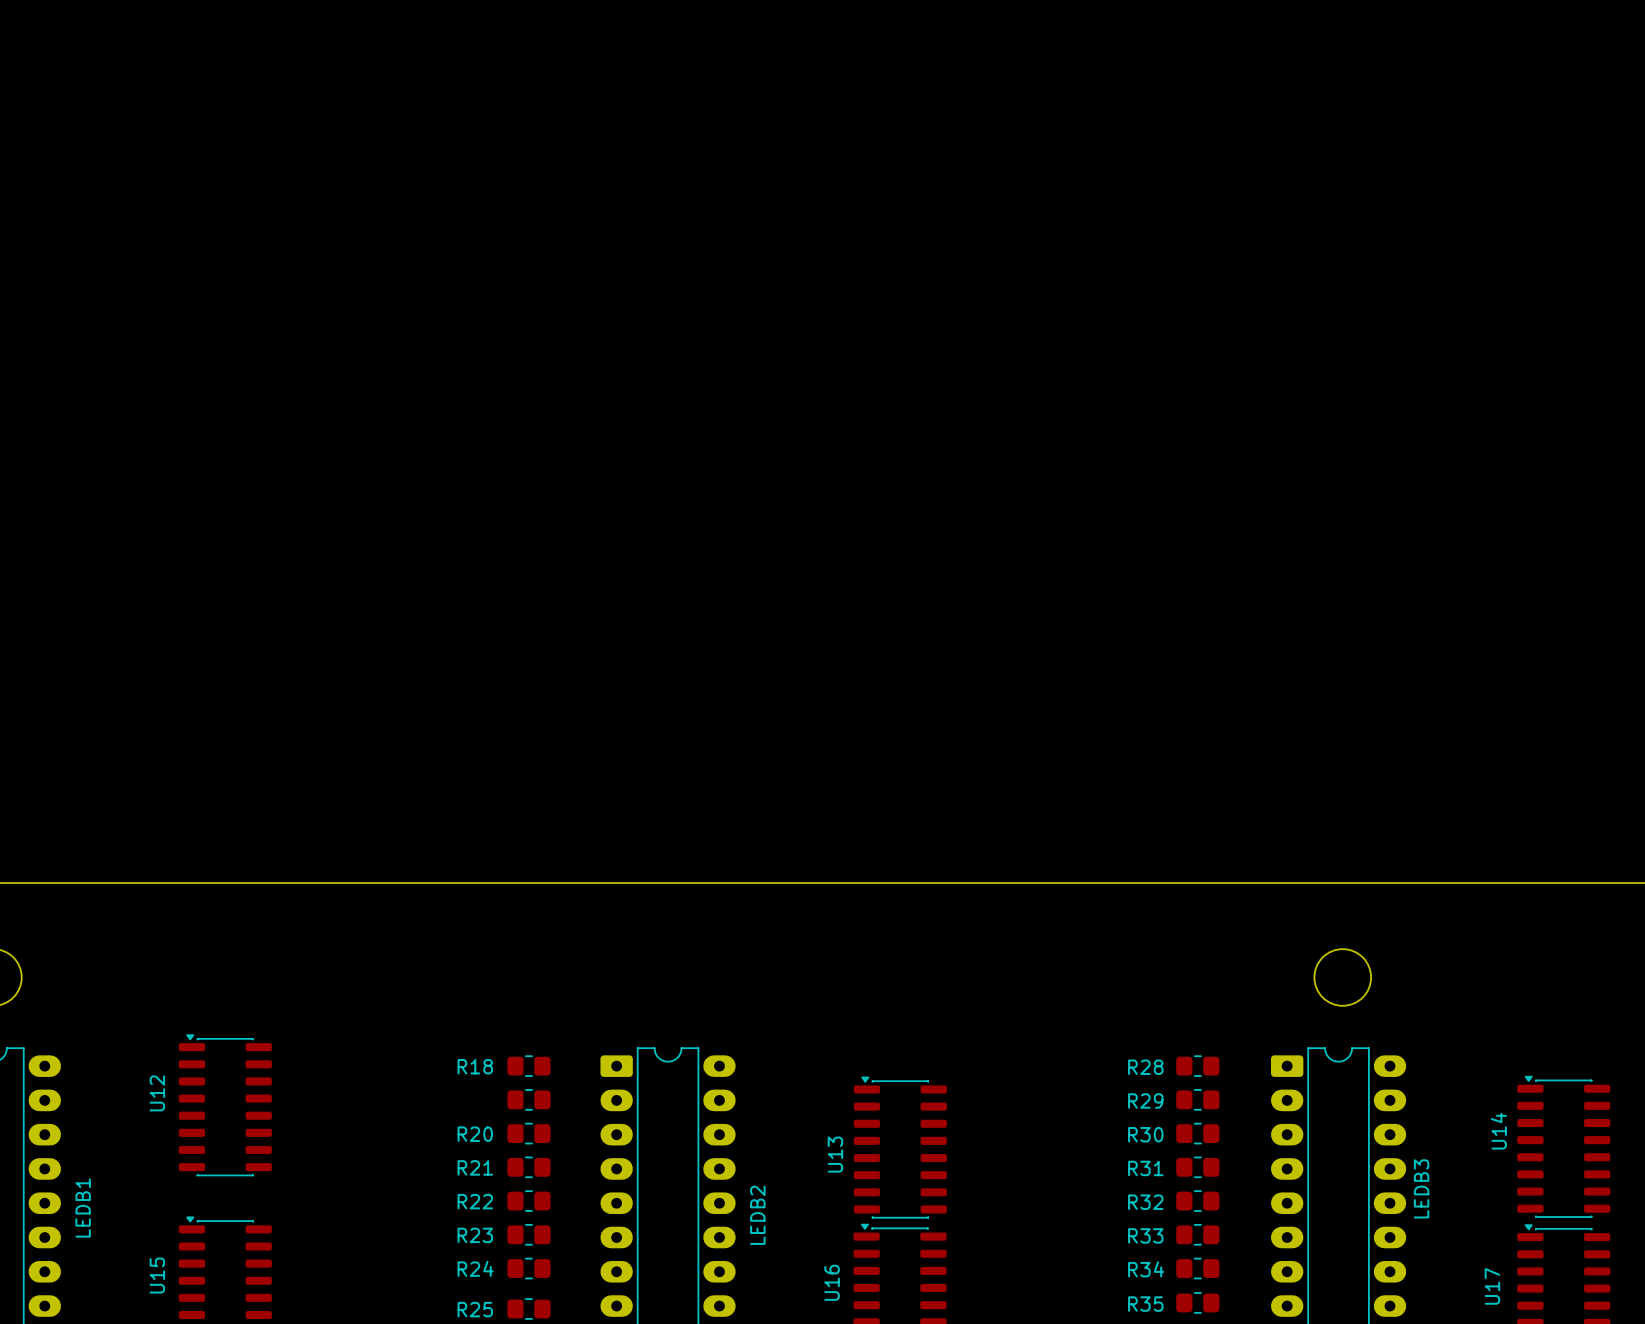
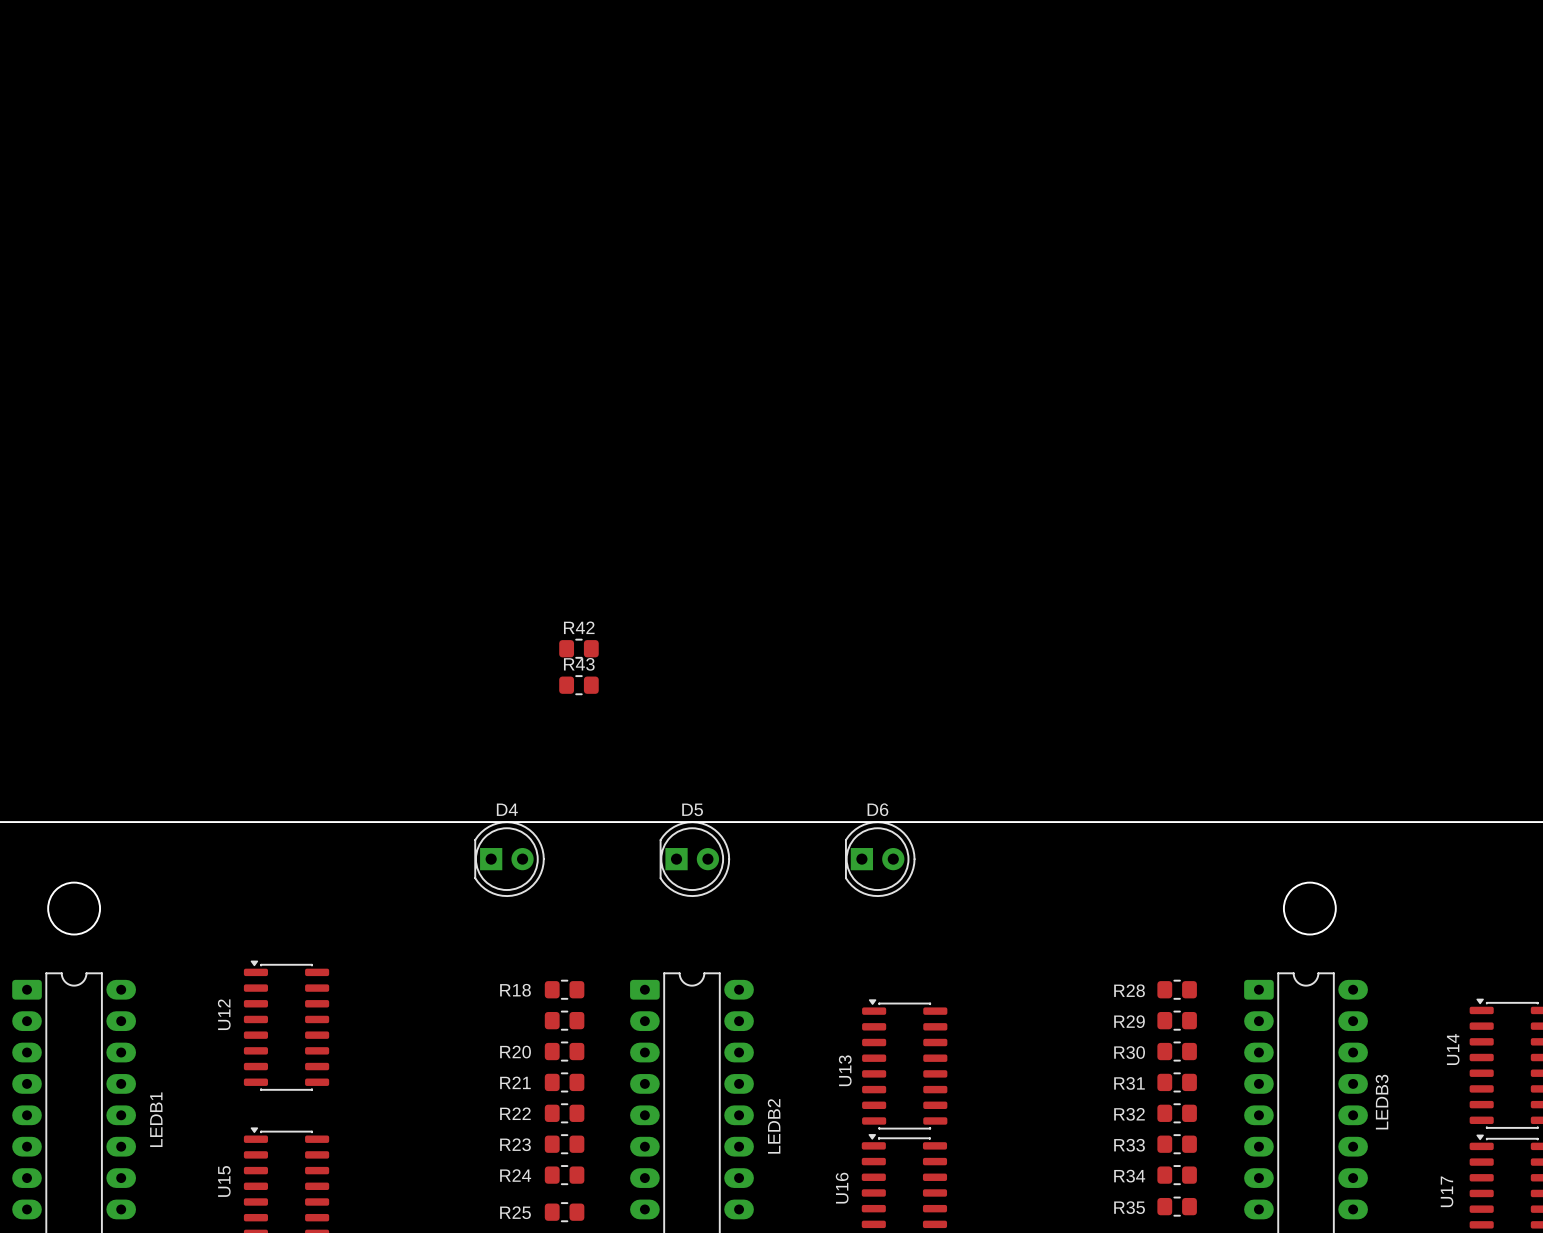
R42: none -> (578, 648)
R43: none -> (578, 685)
D4: none -> (509, 859)
D5: none -> (694, 859)
D6: none -> (880, 859)

